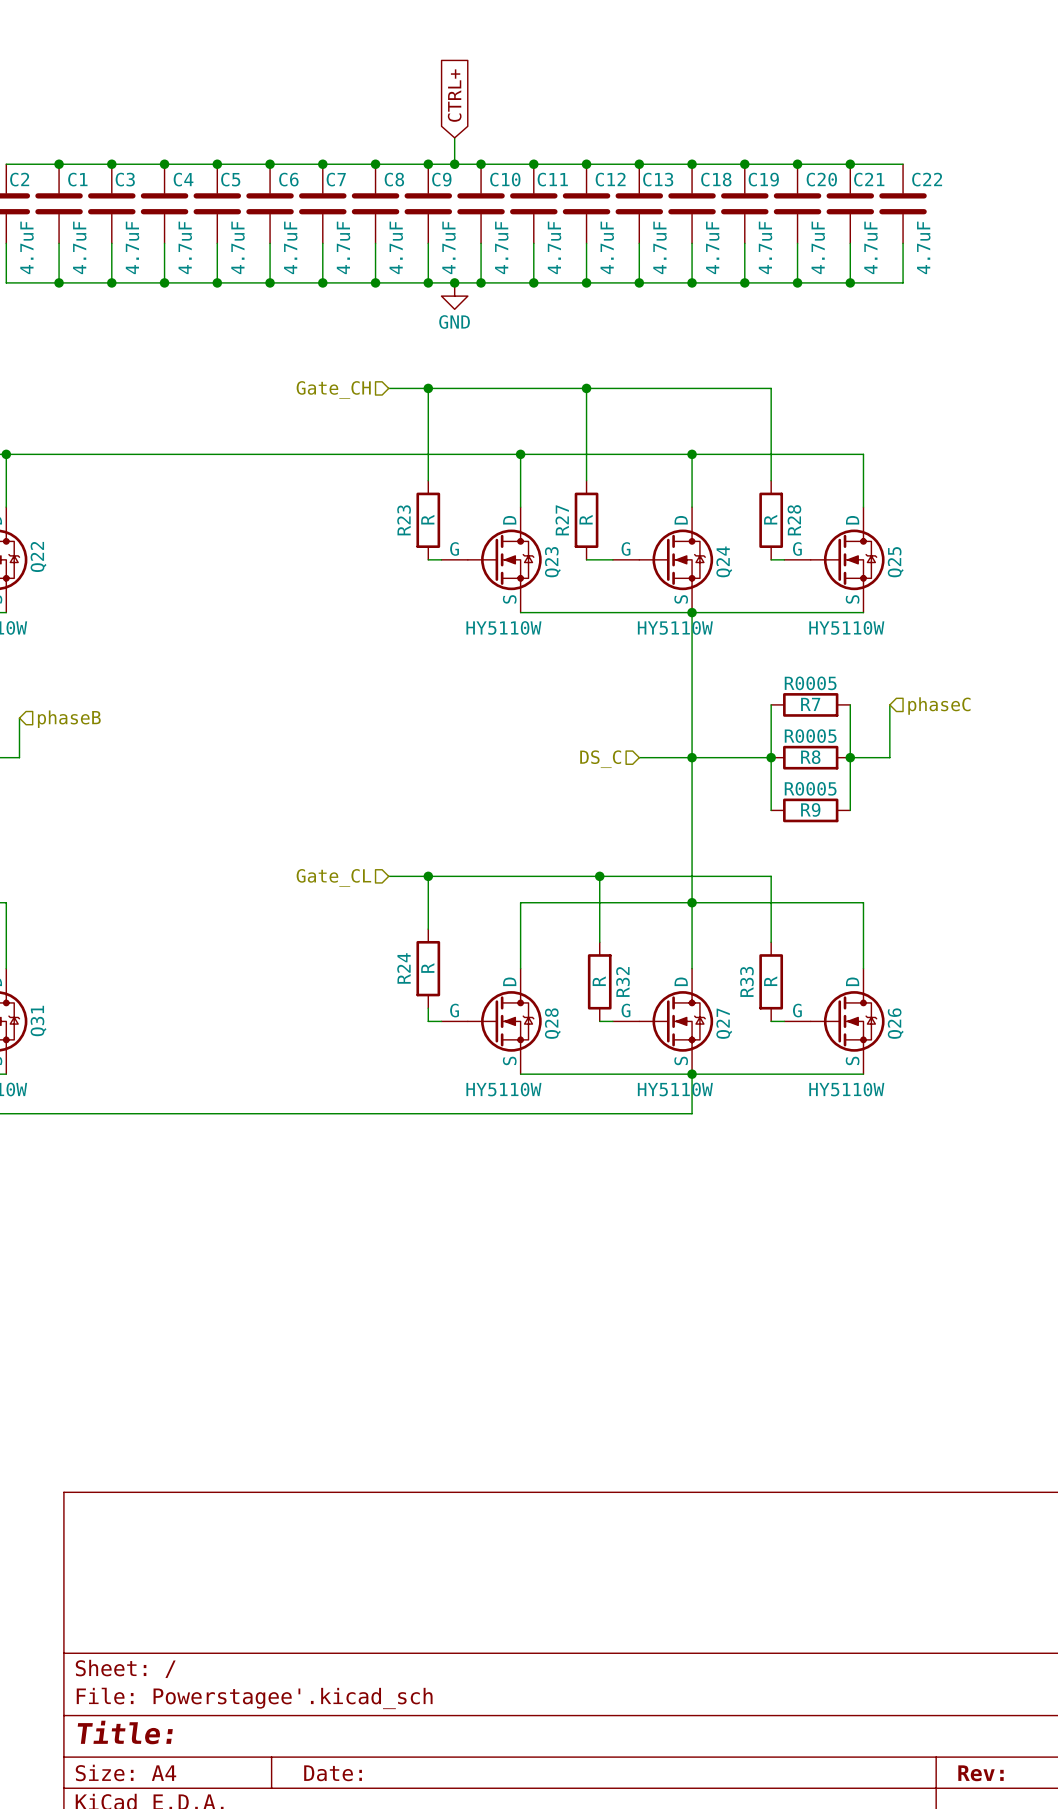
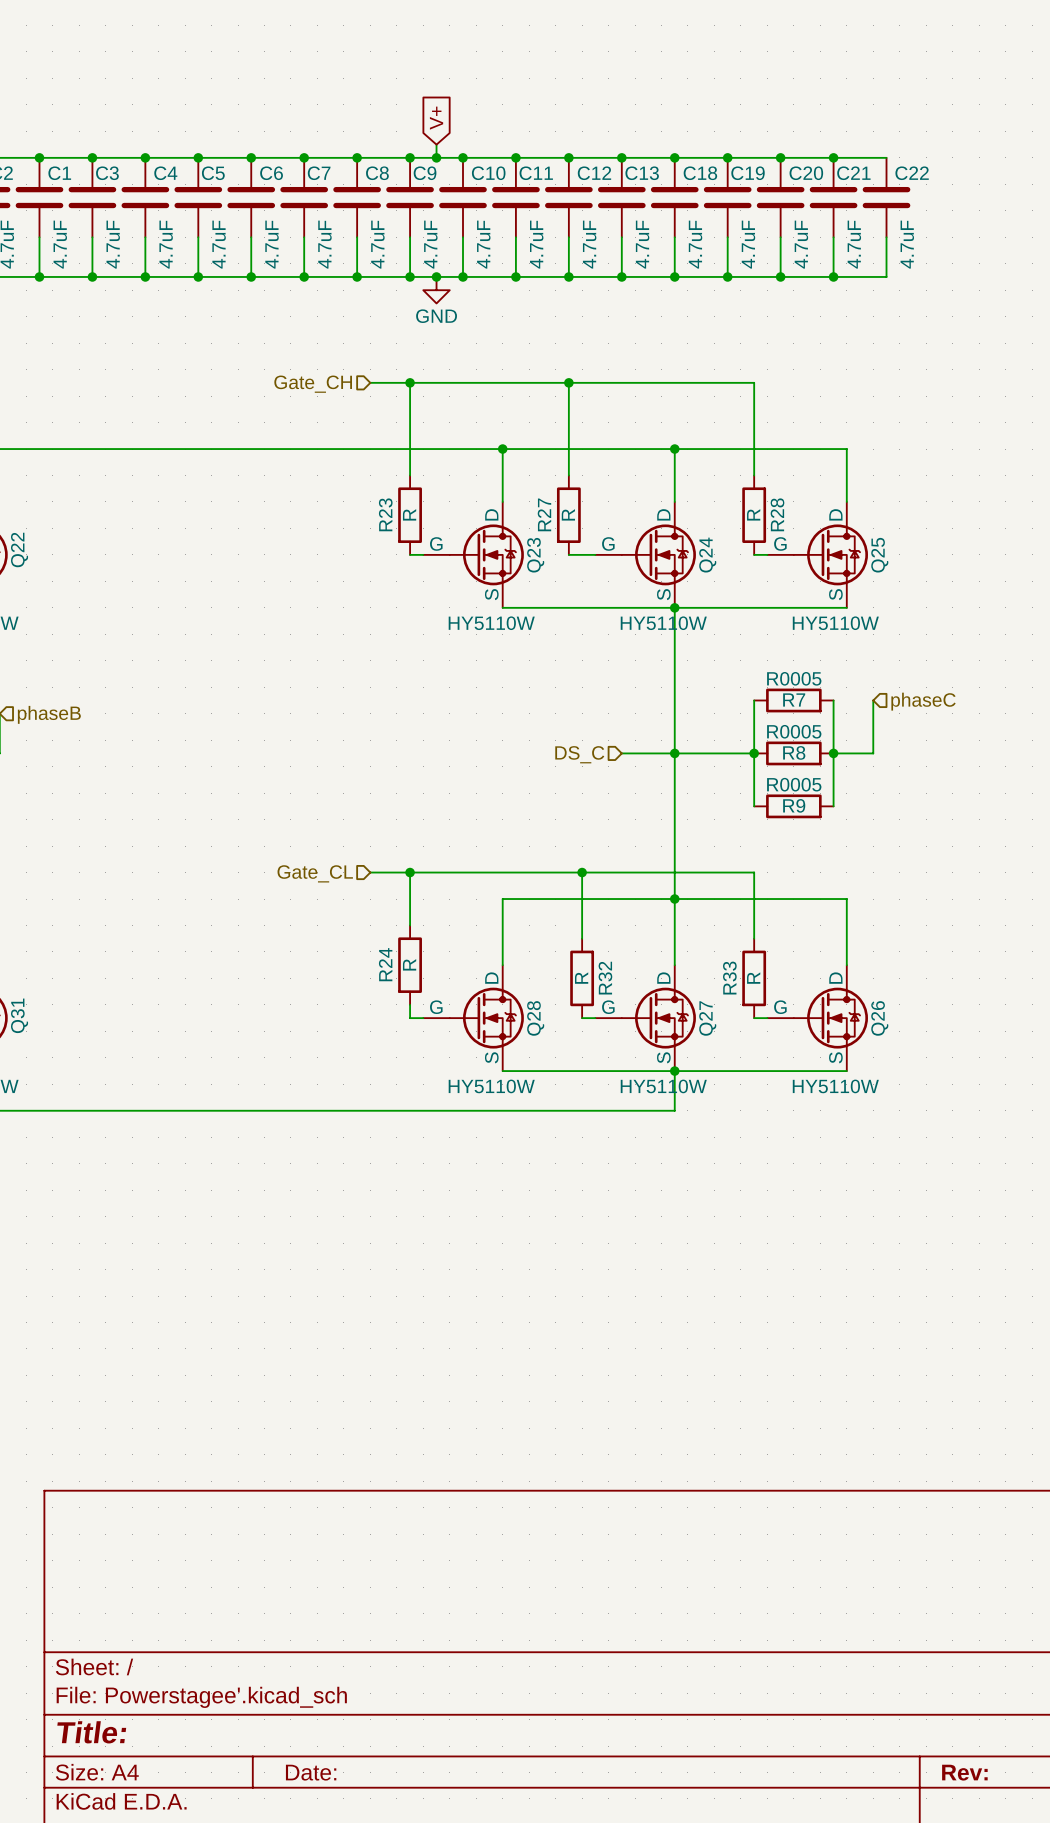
global label: CTRL+ (454, 95) -> none
global label: none -> V+ (436, 118)
wire: (454, 137) (454, 151) -> none

